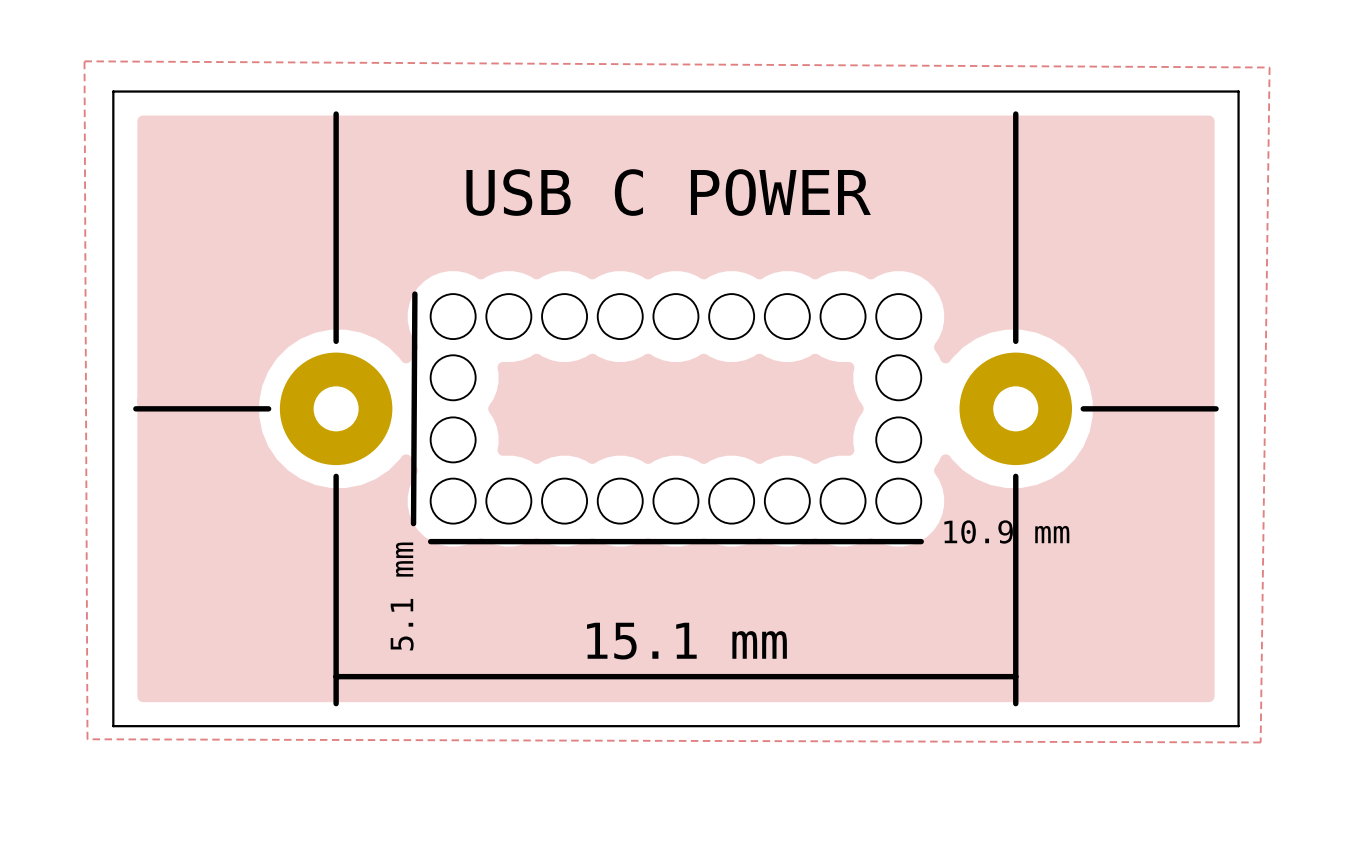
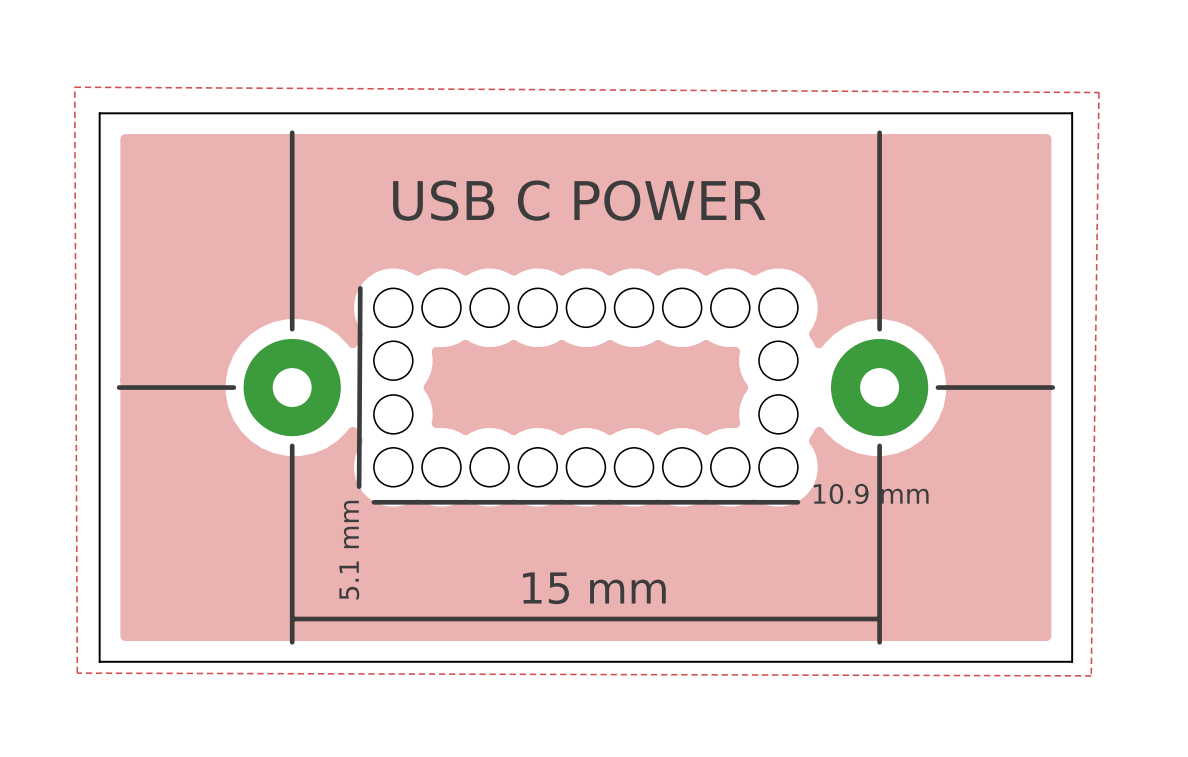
text: 15.1 mm (686, 641) -> 15 mm (594, 588)

